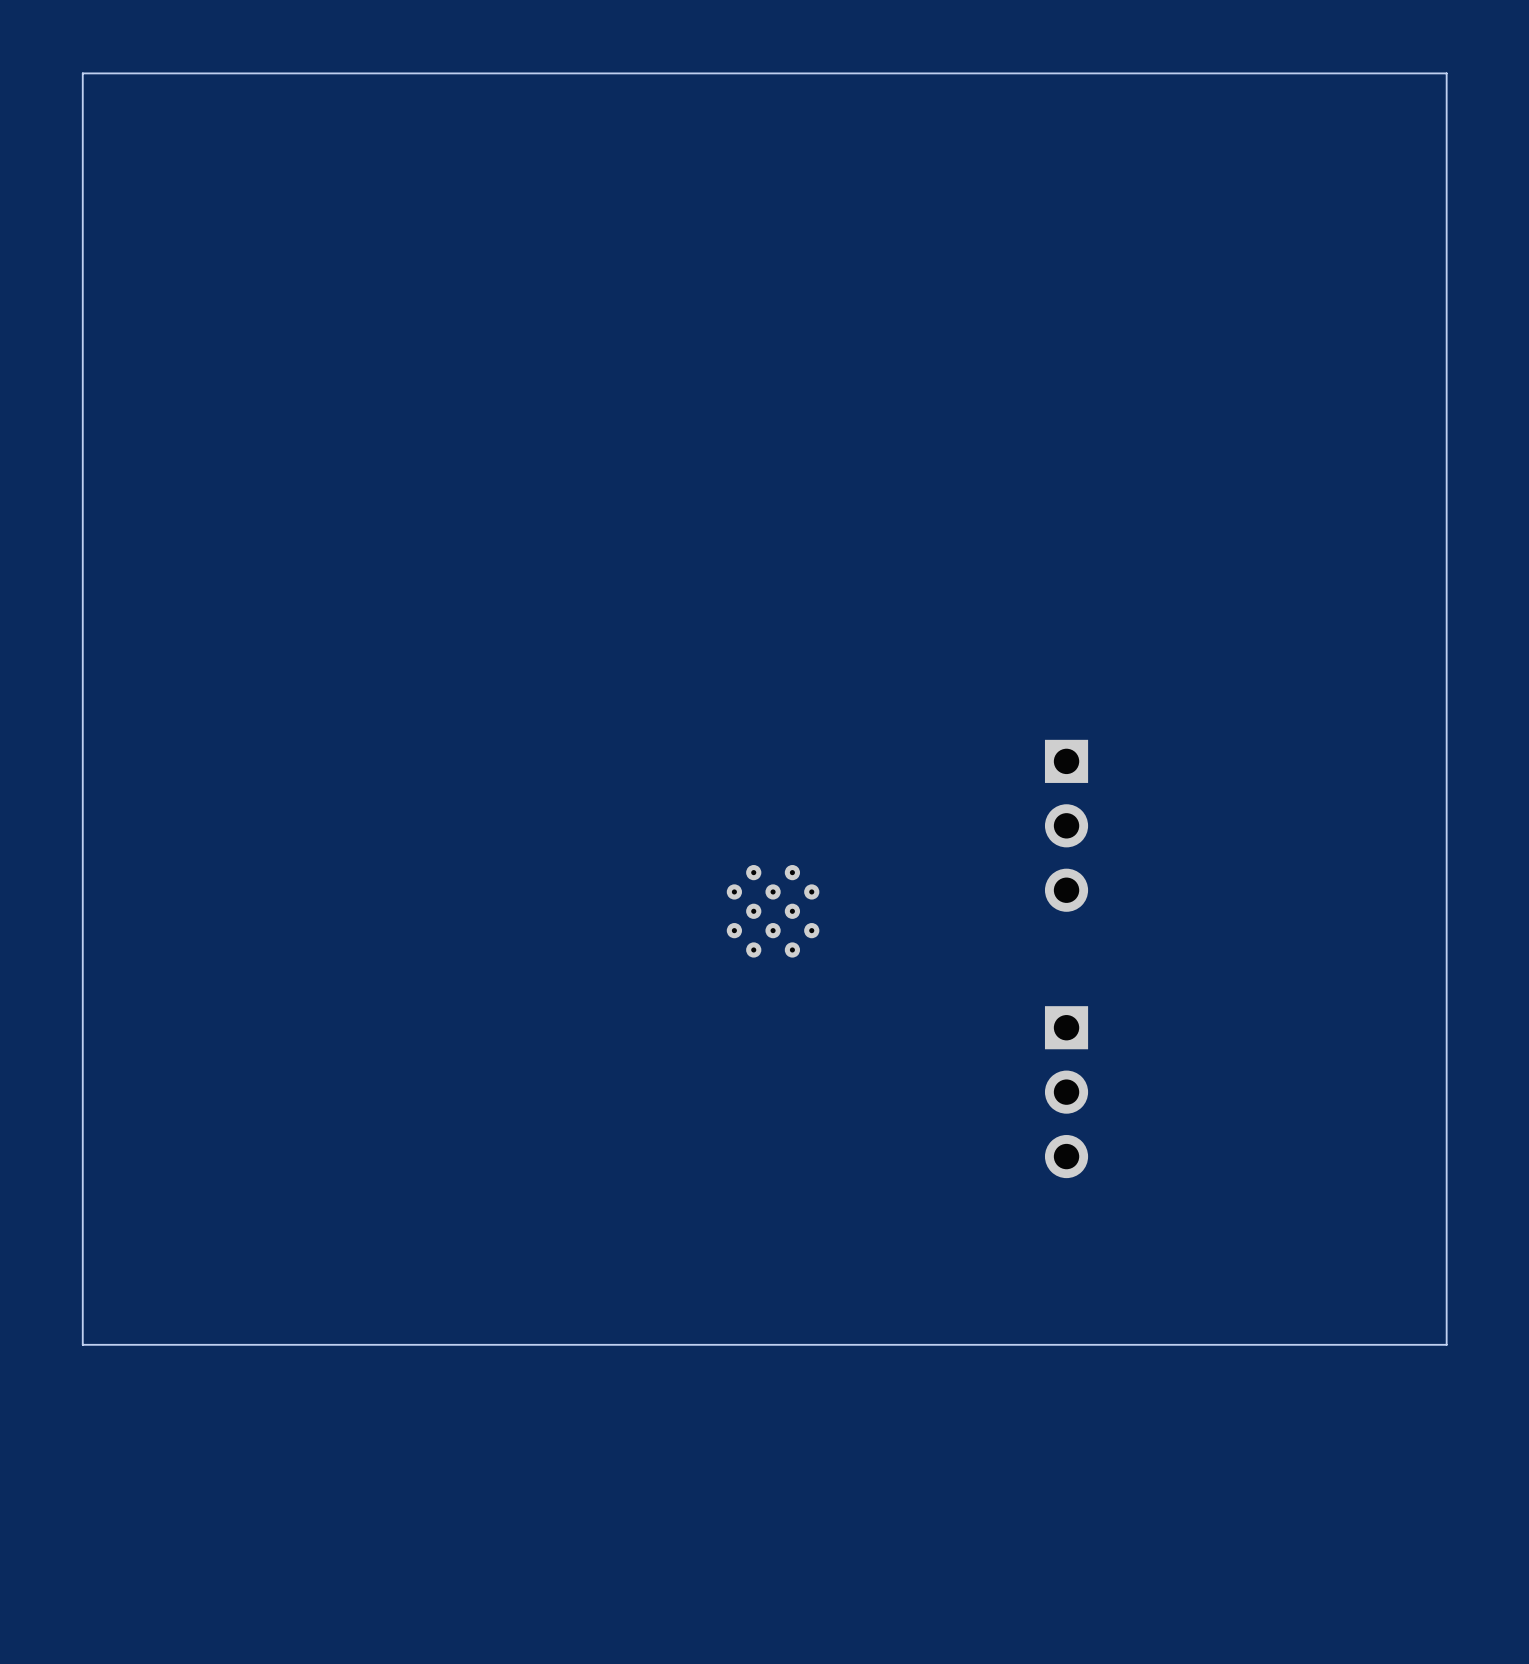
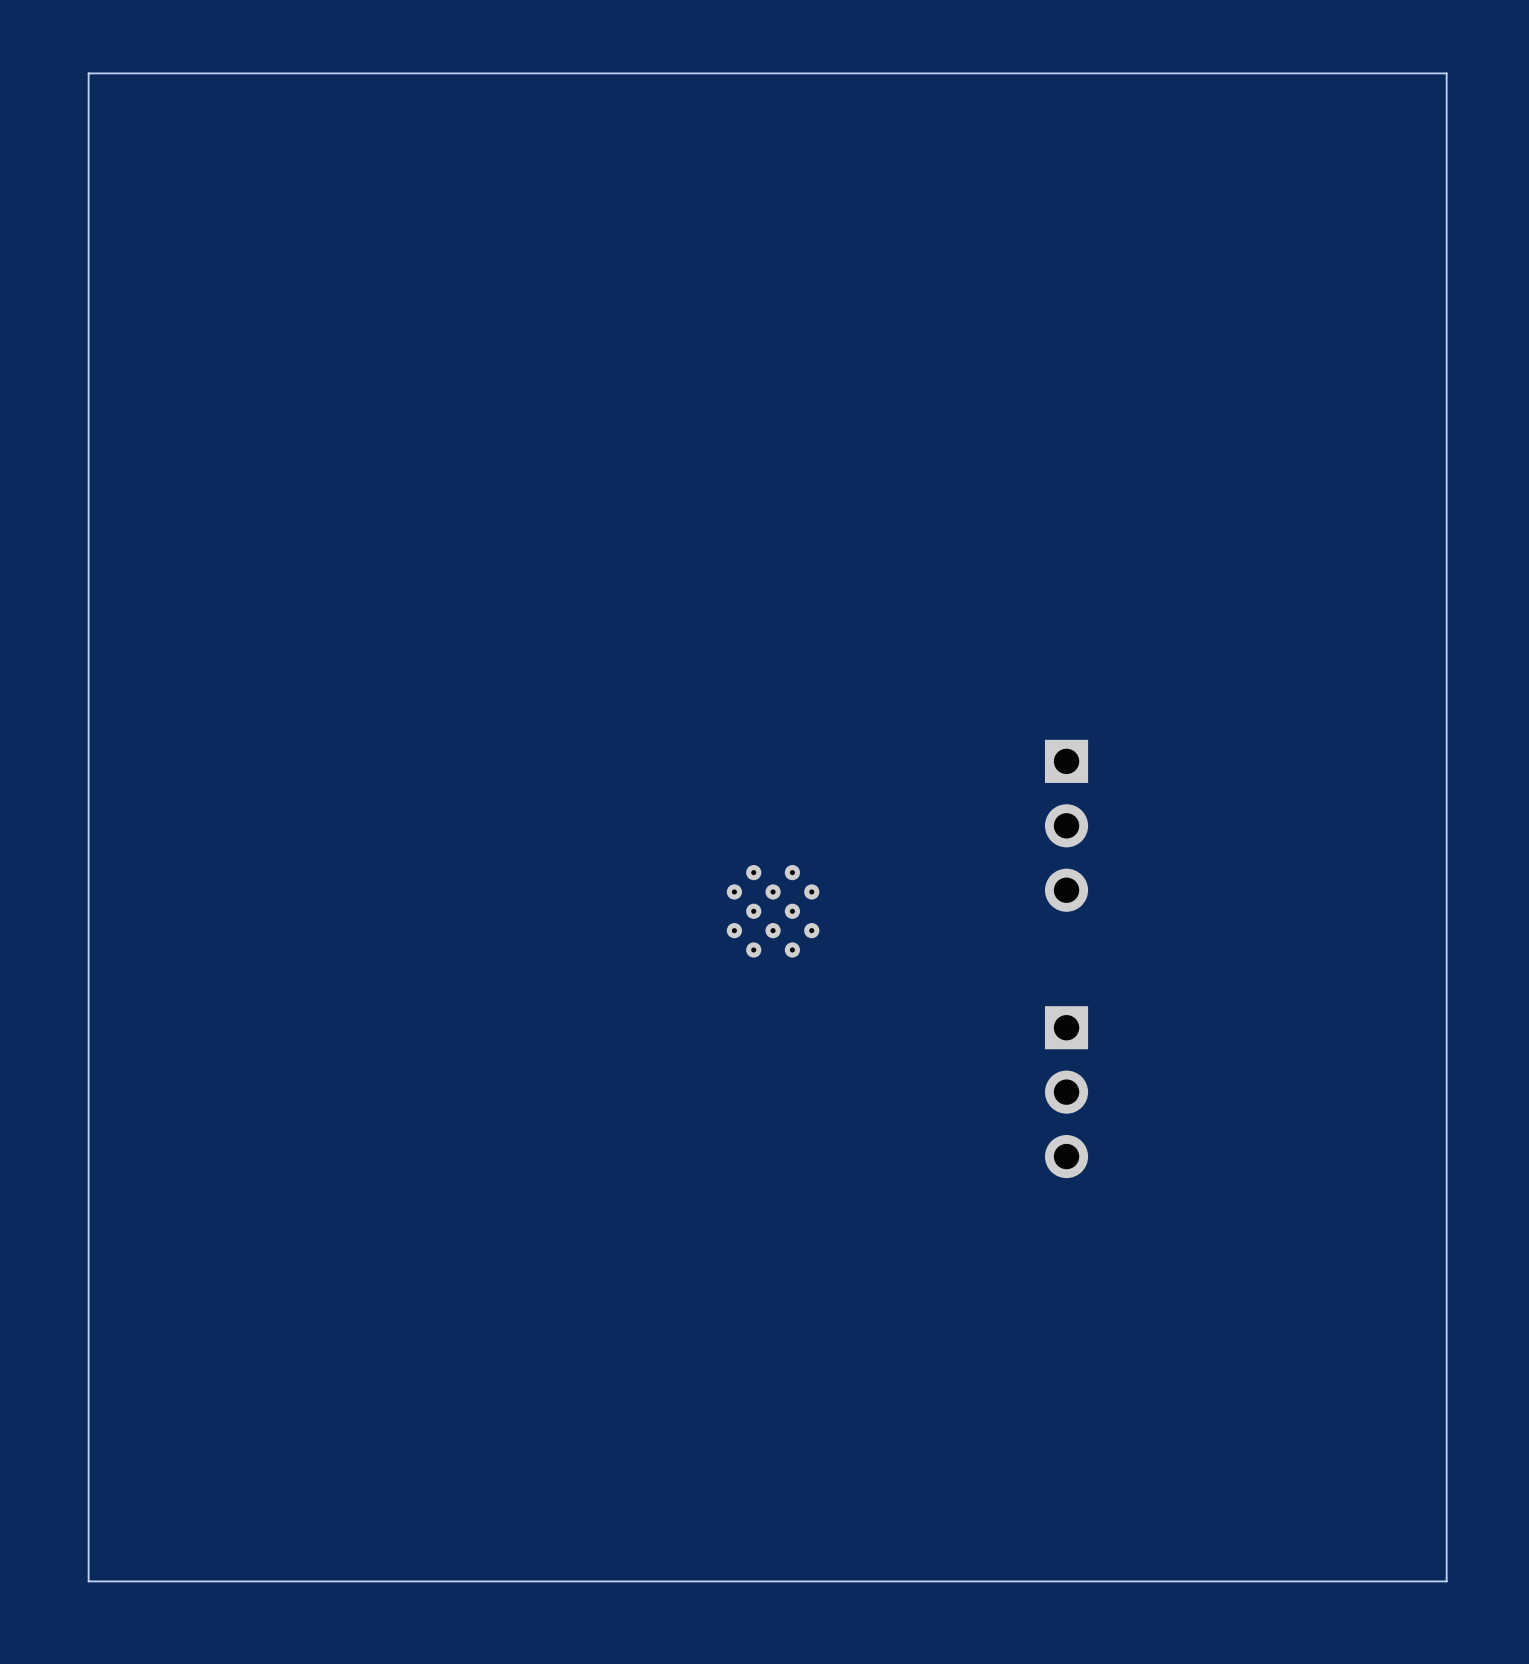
board edge: (88, 73) (82, 73) (82, 1344) (1446, 1344) -> (88, 73) (88, 1581) (1446, 1581) (1446, 1344)

